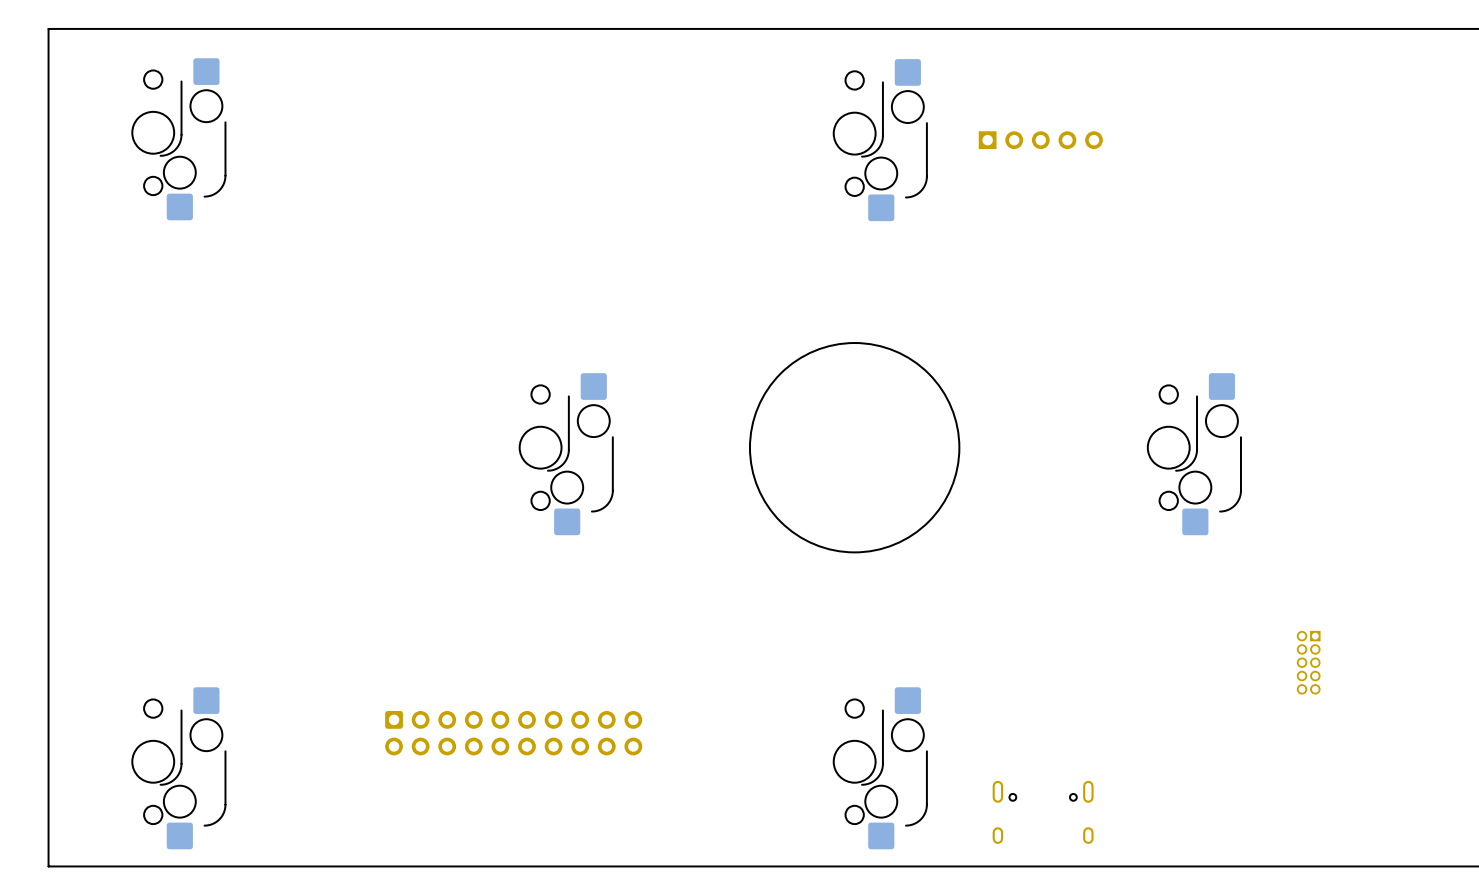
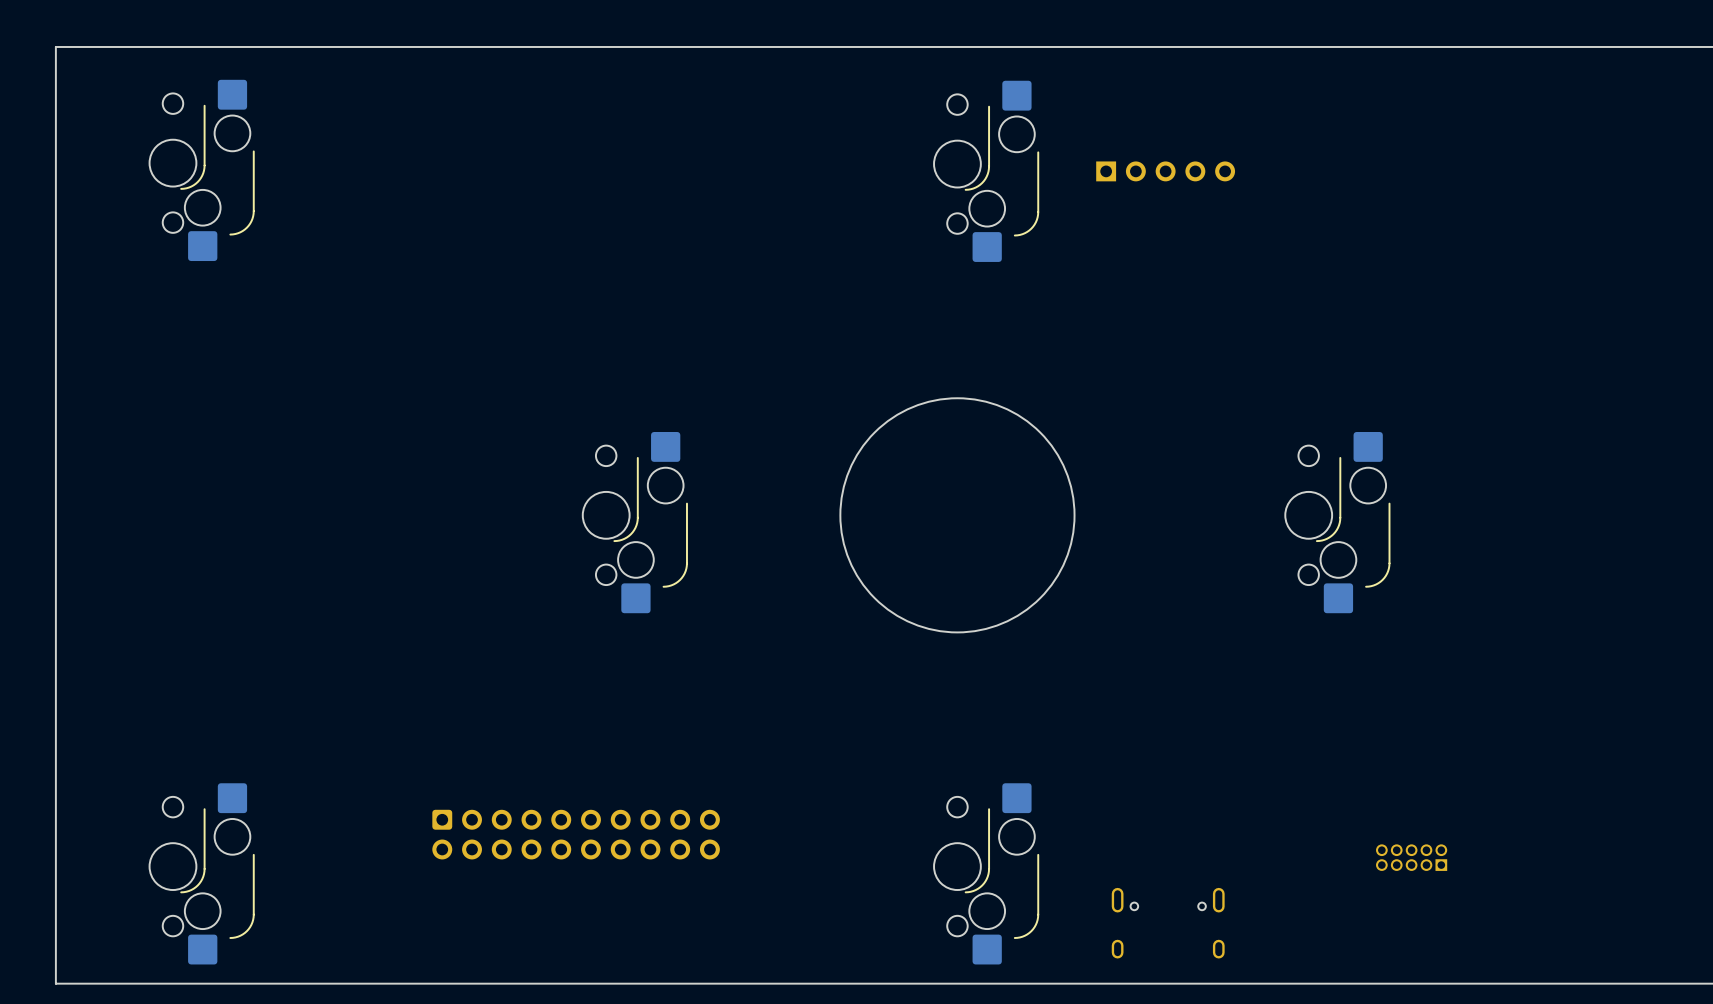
part rotation: 0° (1308, 662) -> 90° clockwise (1411, 857)
part position: (1308, 662) -> (1411, 857)

